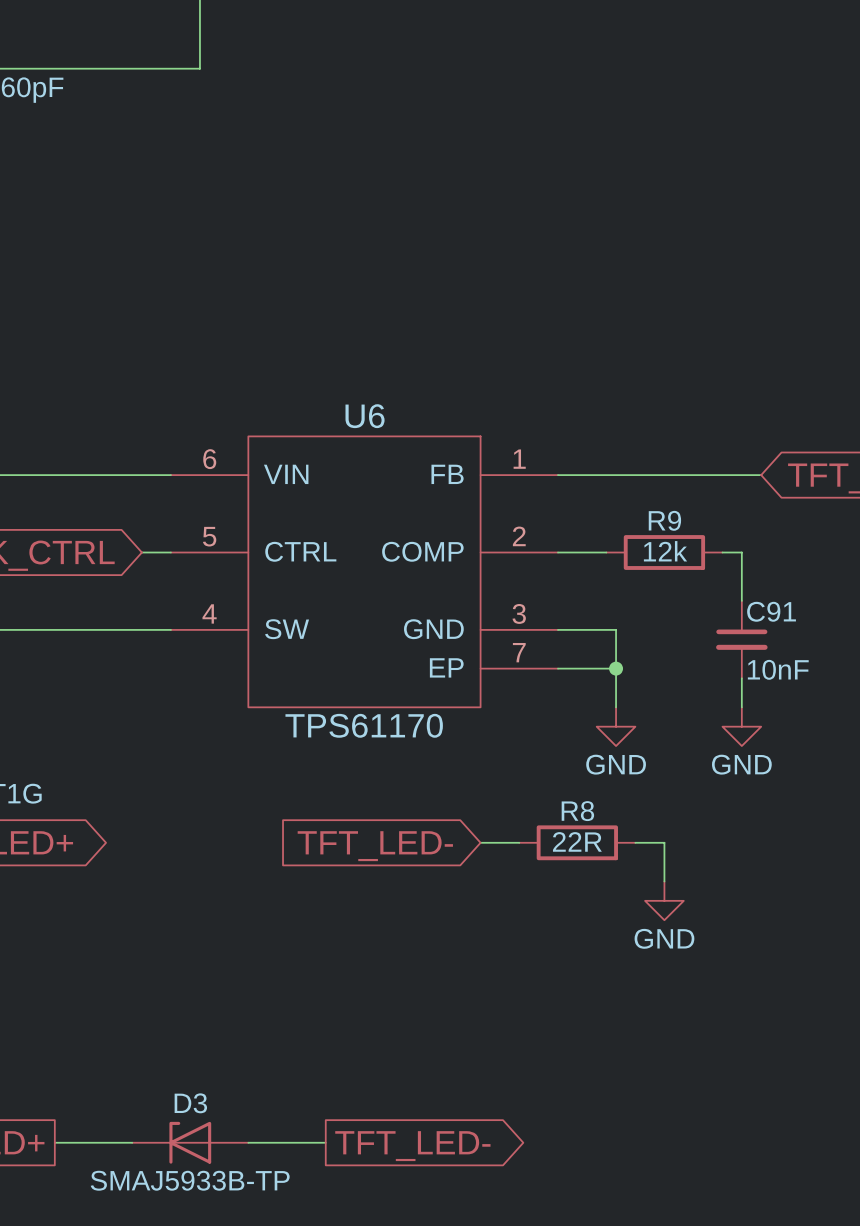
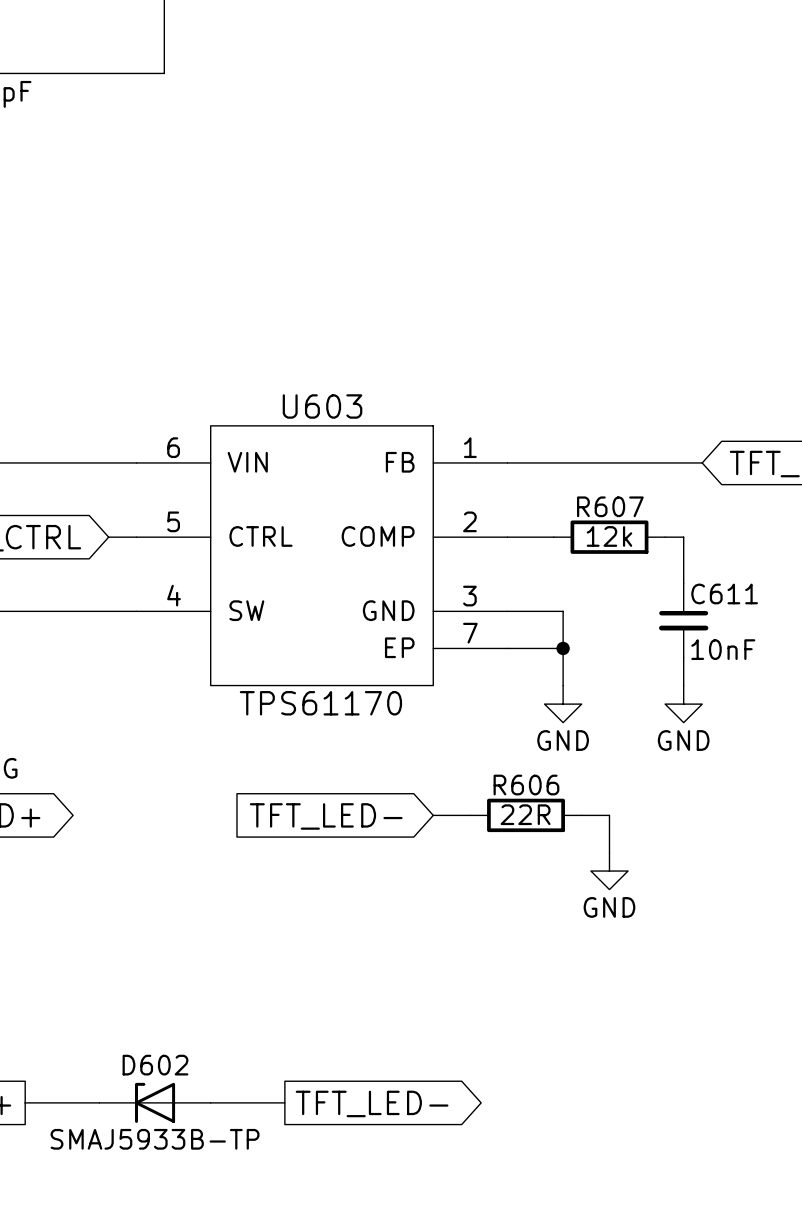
U6 name: U6 (365, 416) -> U603 (322, 406)
R9 name: R9 (664, 520) -> R607 (610, 506)
C91 name: C91 (771, 611) -> C611 (724, 593)
R8 name: R8 (577, 811) -> R606 (526, 785)
D3 name: D3 (190, 1103) -> D602 (155, 1065)

